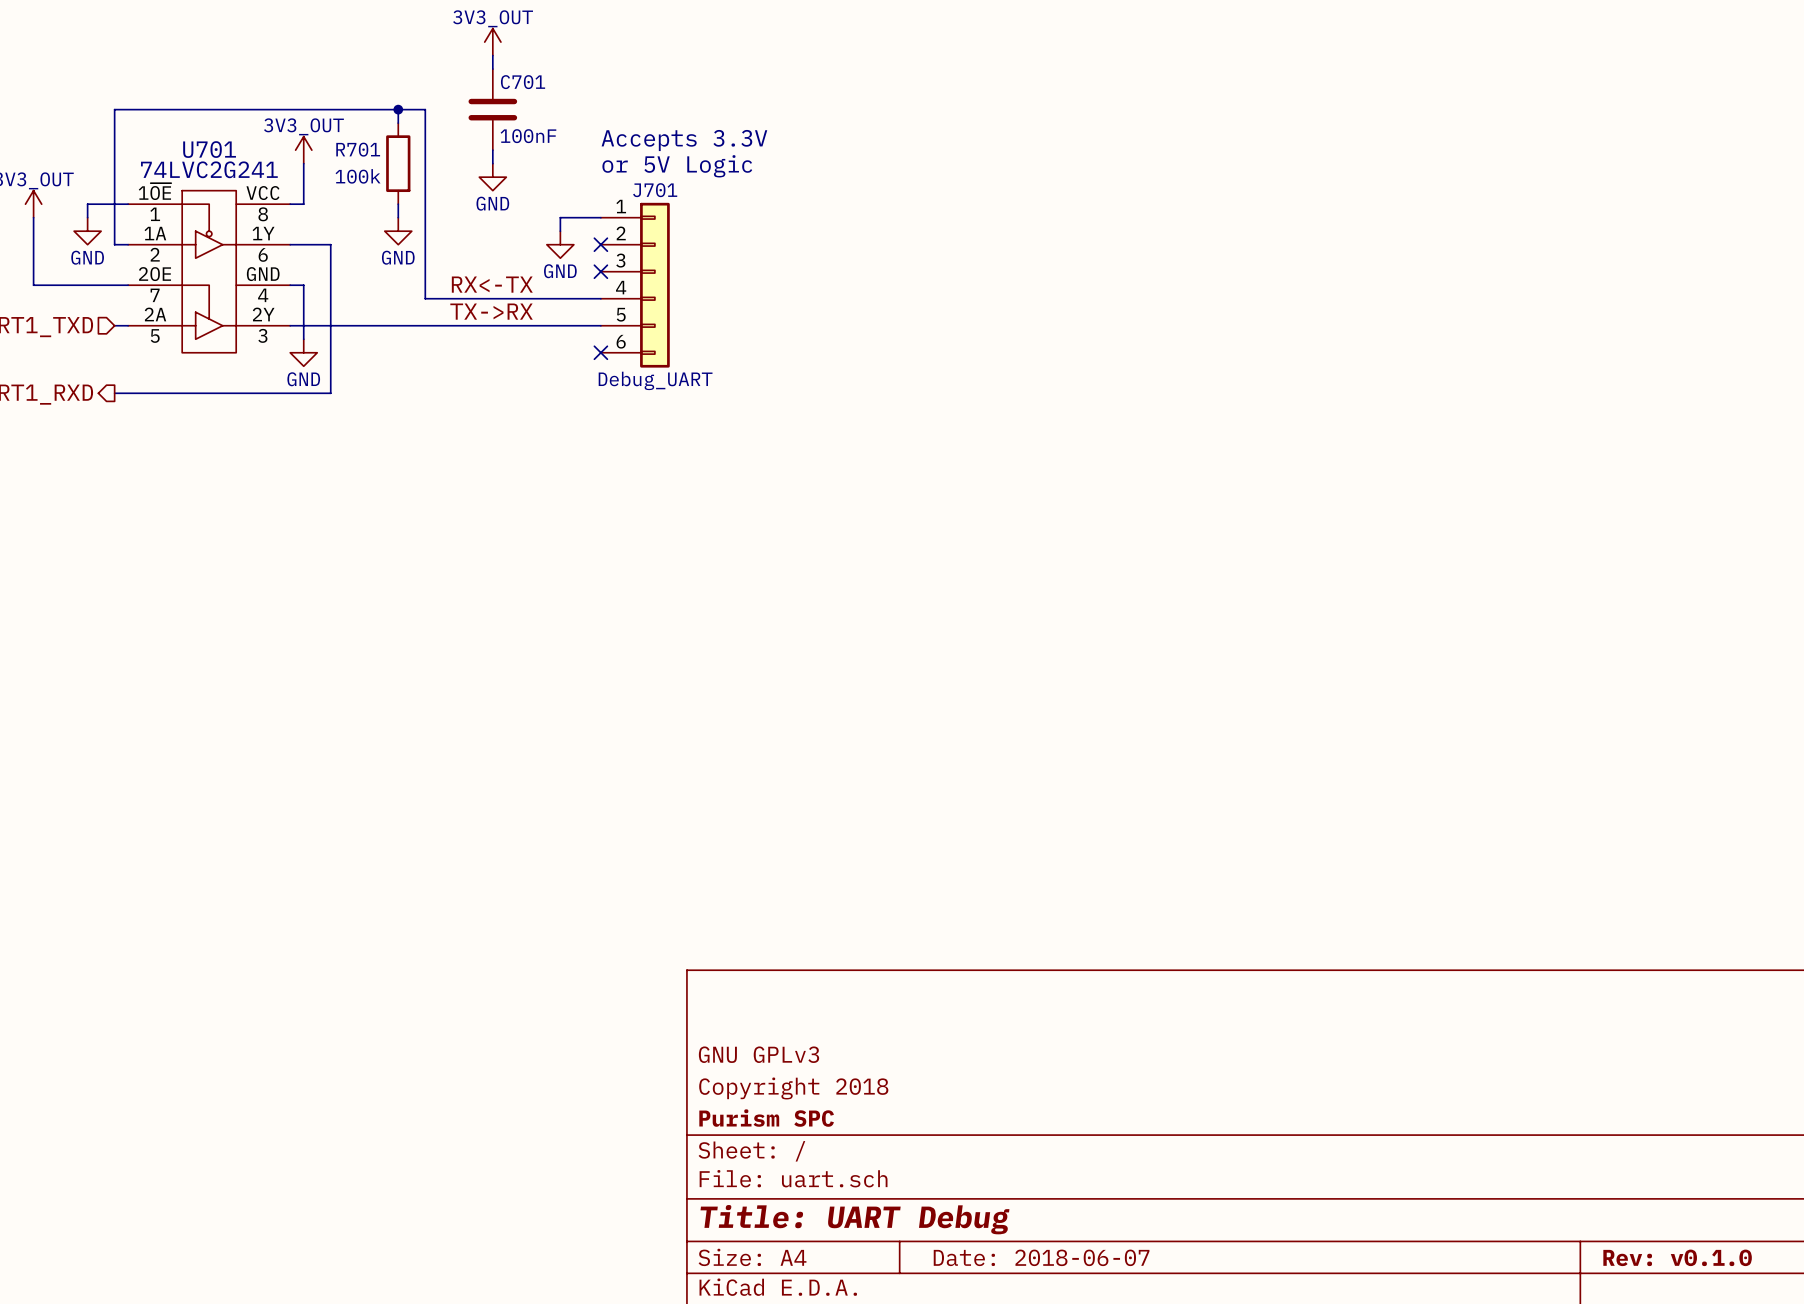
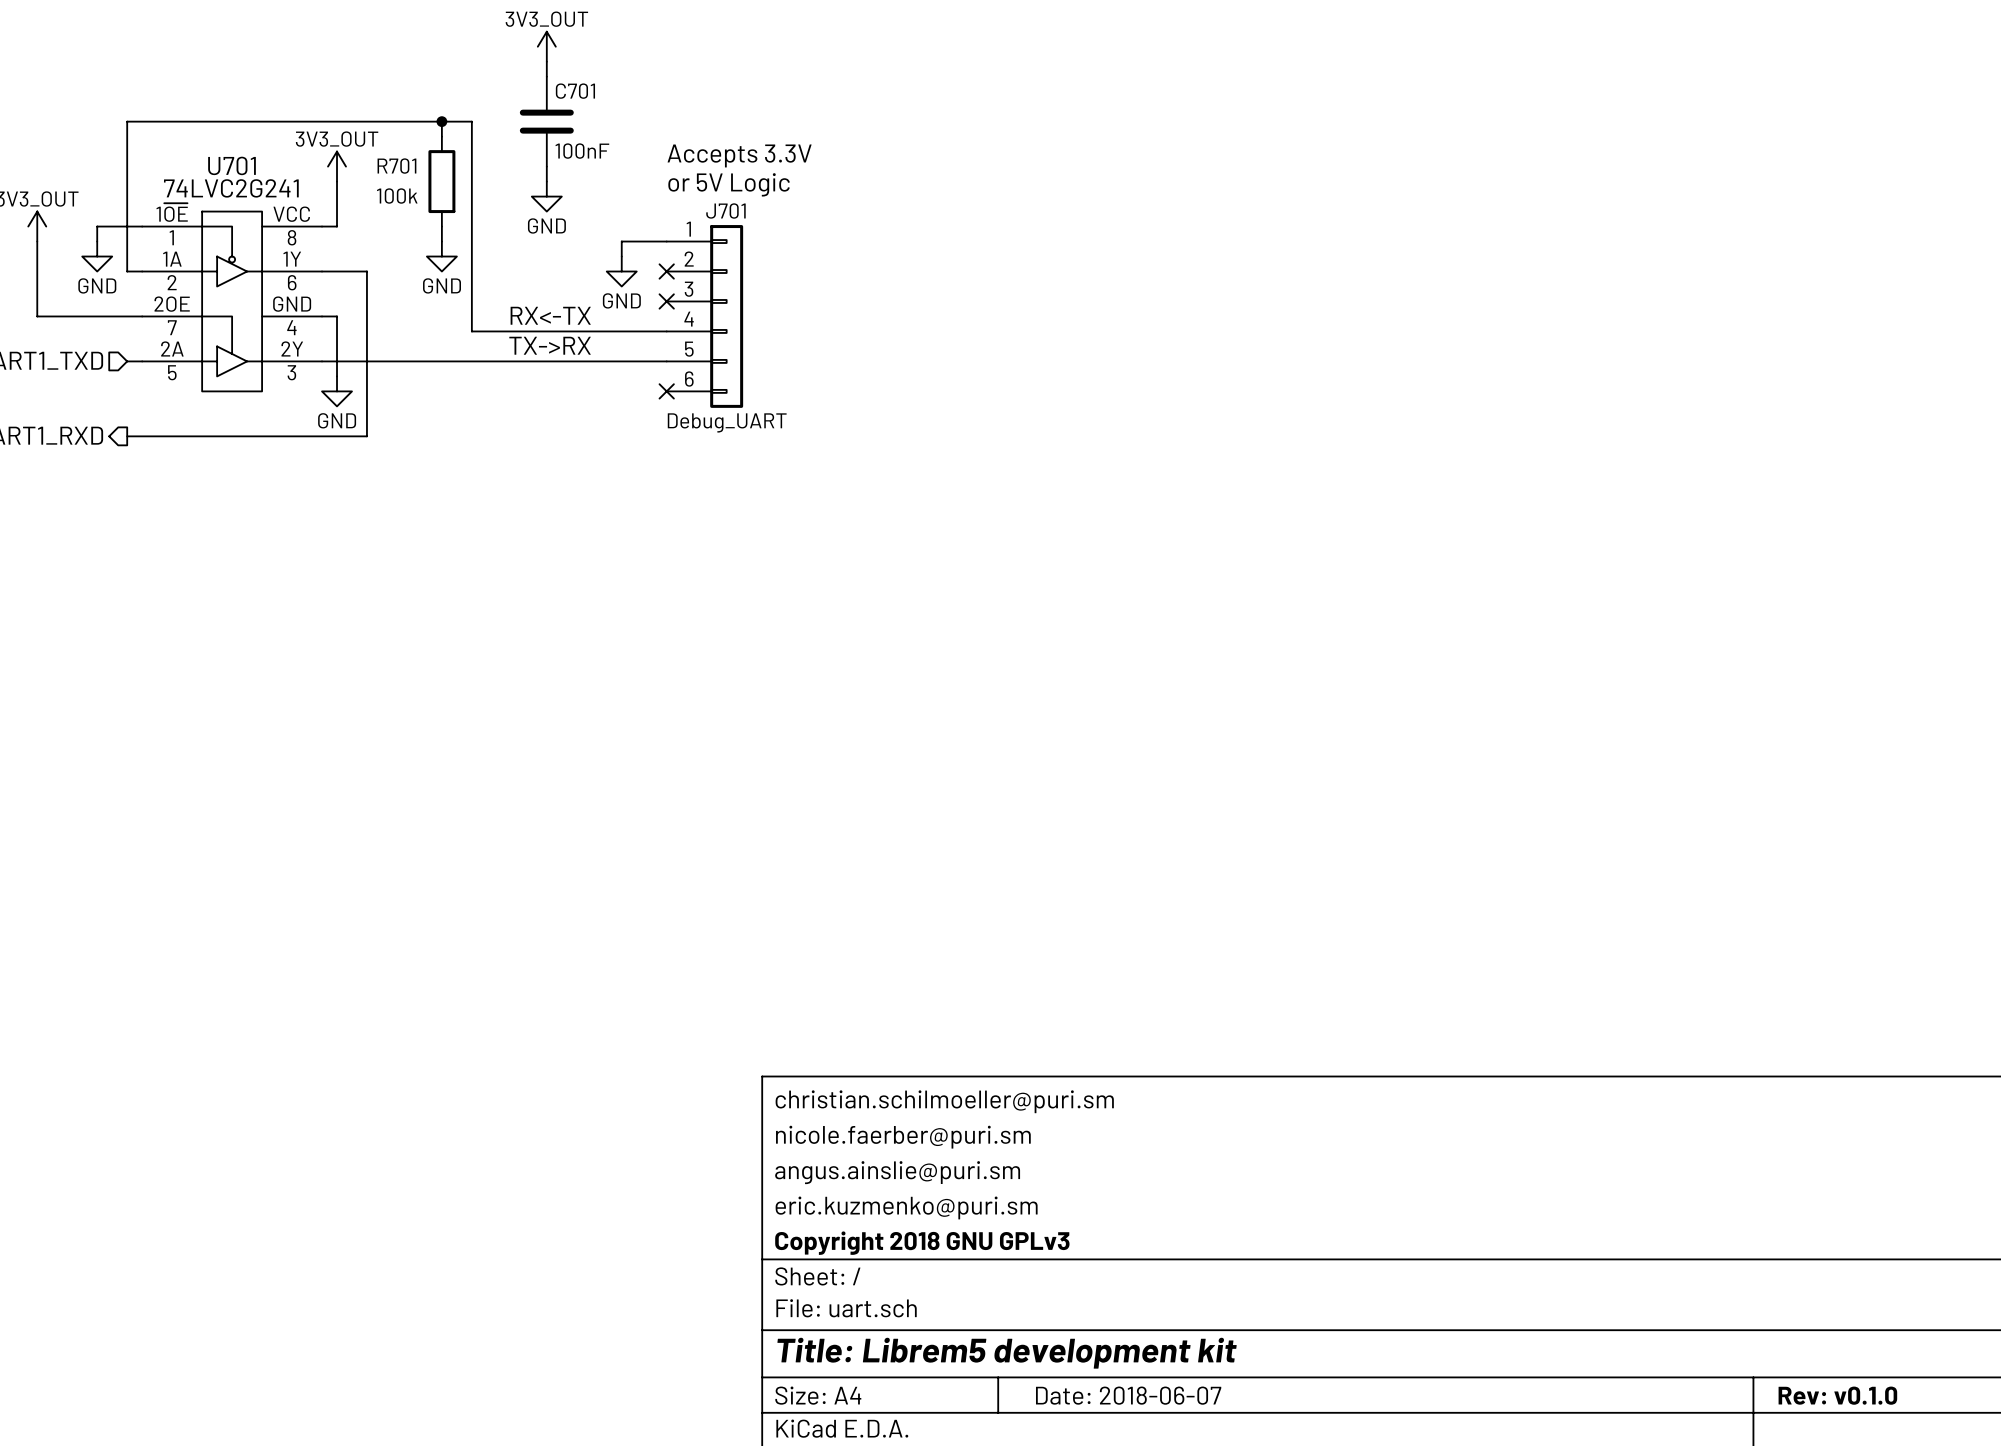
title block: none -> christian.schilmoeller@puri.sm (944, 1101)
title block: none -> nicole.faerber@puri.sm (903, 1137)
title block: GNU GPLv3 (759, 1054) -> angus.ainslie@puri.sm (897, 1172)
title block: Copyright 2018 (793, 1088) -> eric.kuzmenko@puri.sm (906, 1207)
title block: Purism SPC (766, 1118) -> Copyright 2018 GNU GPLv3 (922, 1243)
title block: Title: UART Debug (854, 1219) -> Title: Librem5 development kit (1007, 1353)

